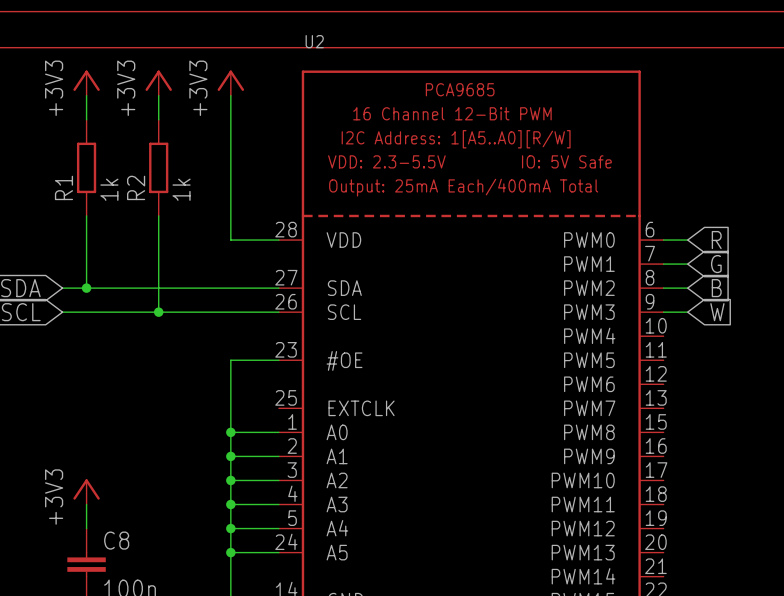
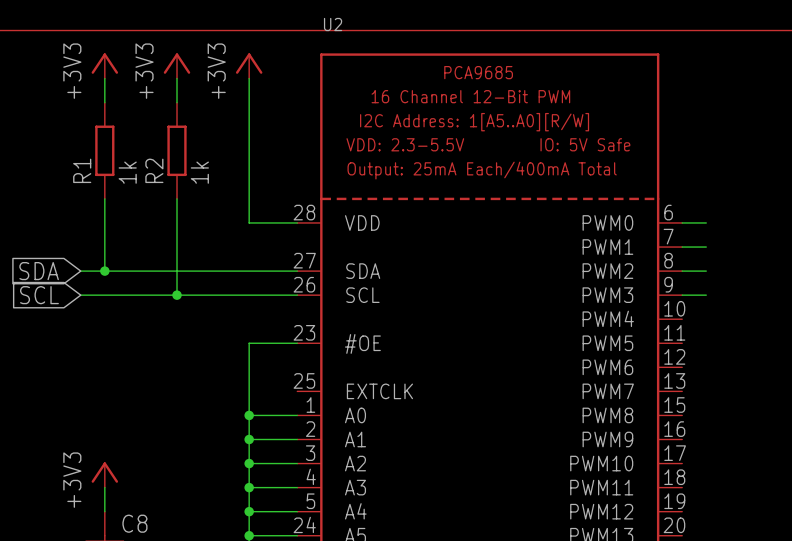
global label: R (716, 240) -> none
global label: G (716, 264) -> none
global label: B (716, 288) -> none
global label: W (717, 312) -> none

